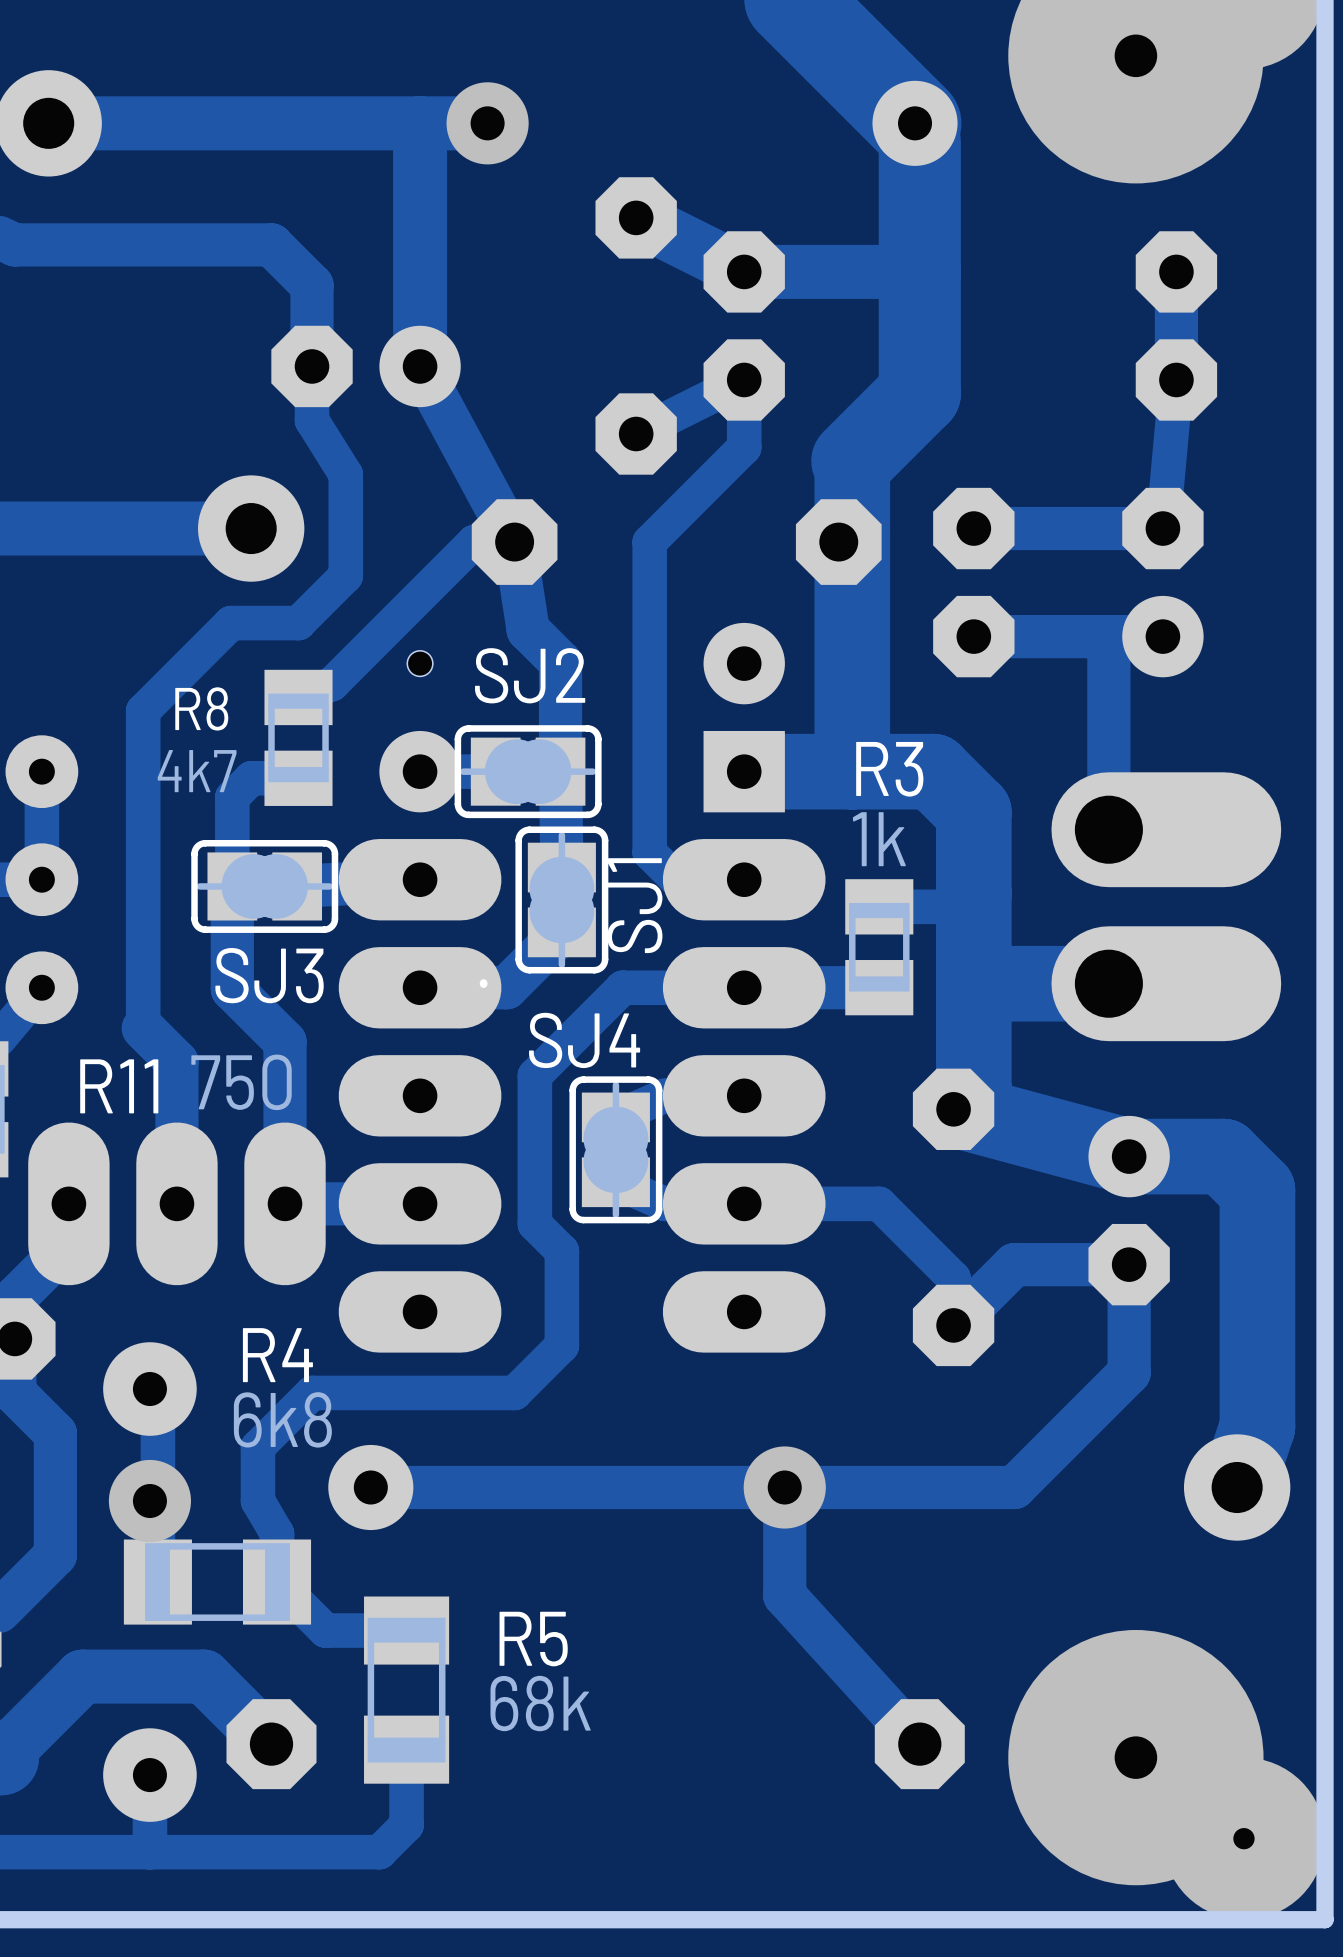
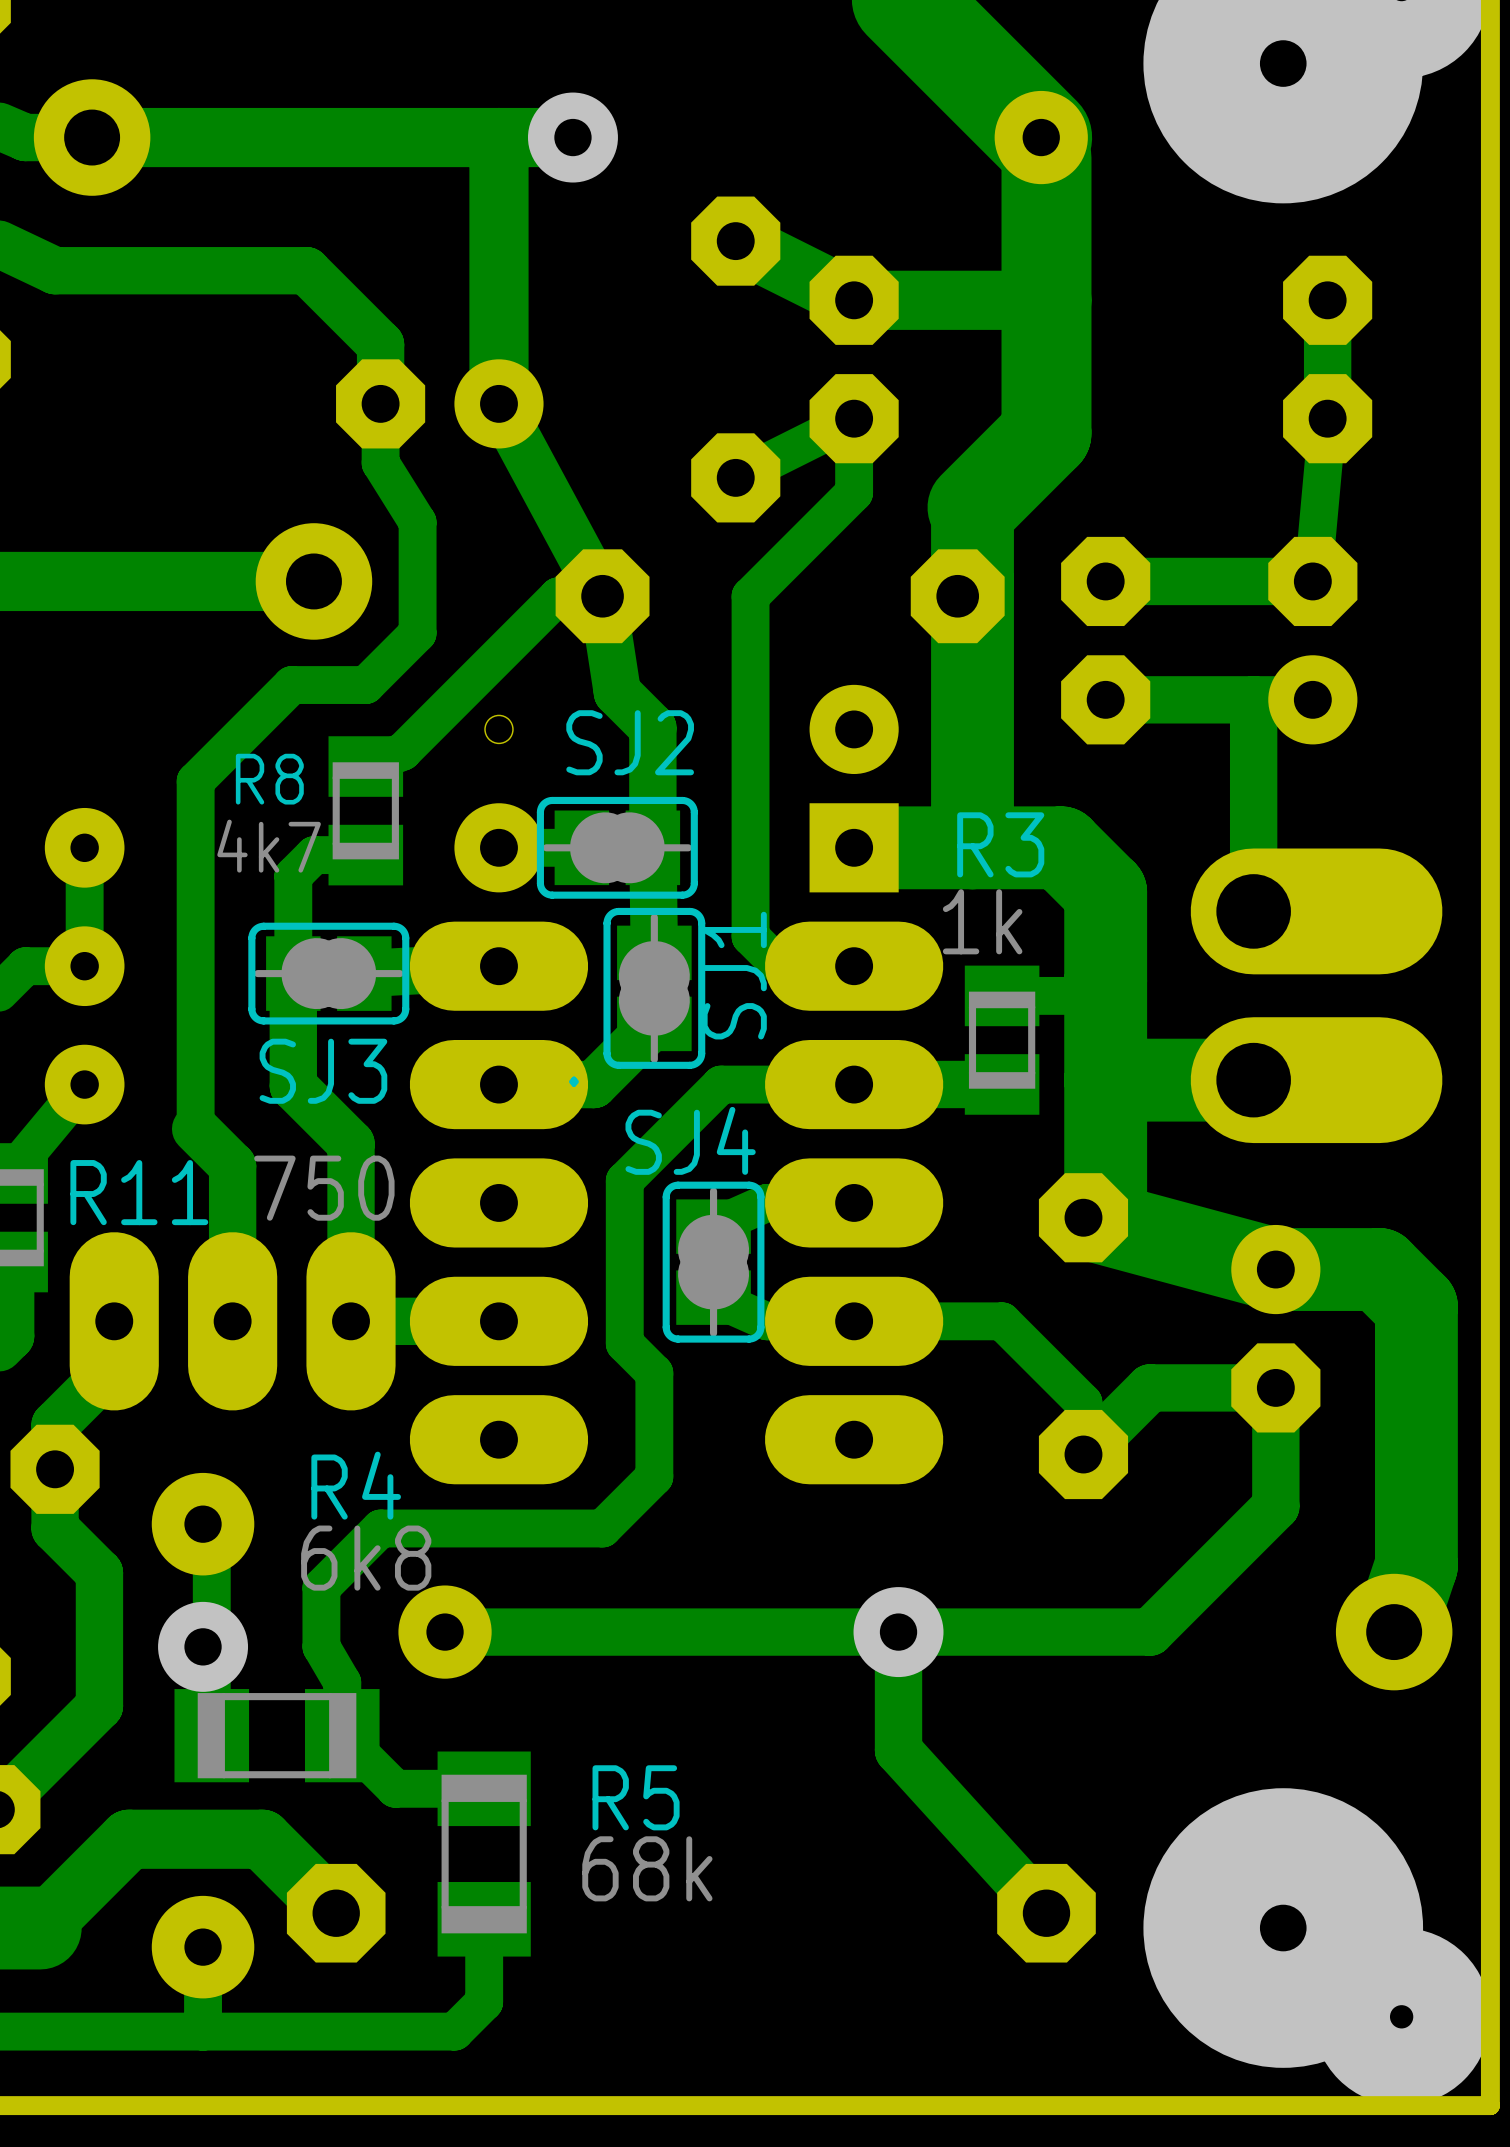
track: (244, 244) (271, 244) (312, 285) (312, 312) -> (306, 270) (380, 344)

